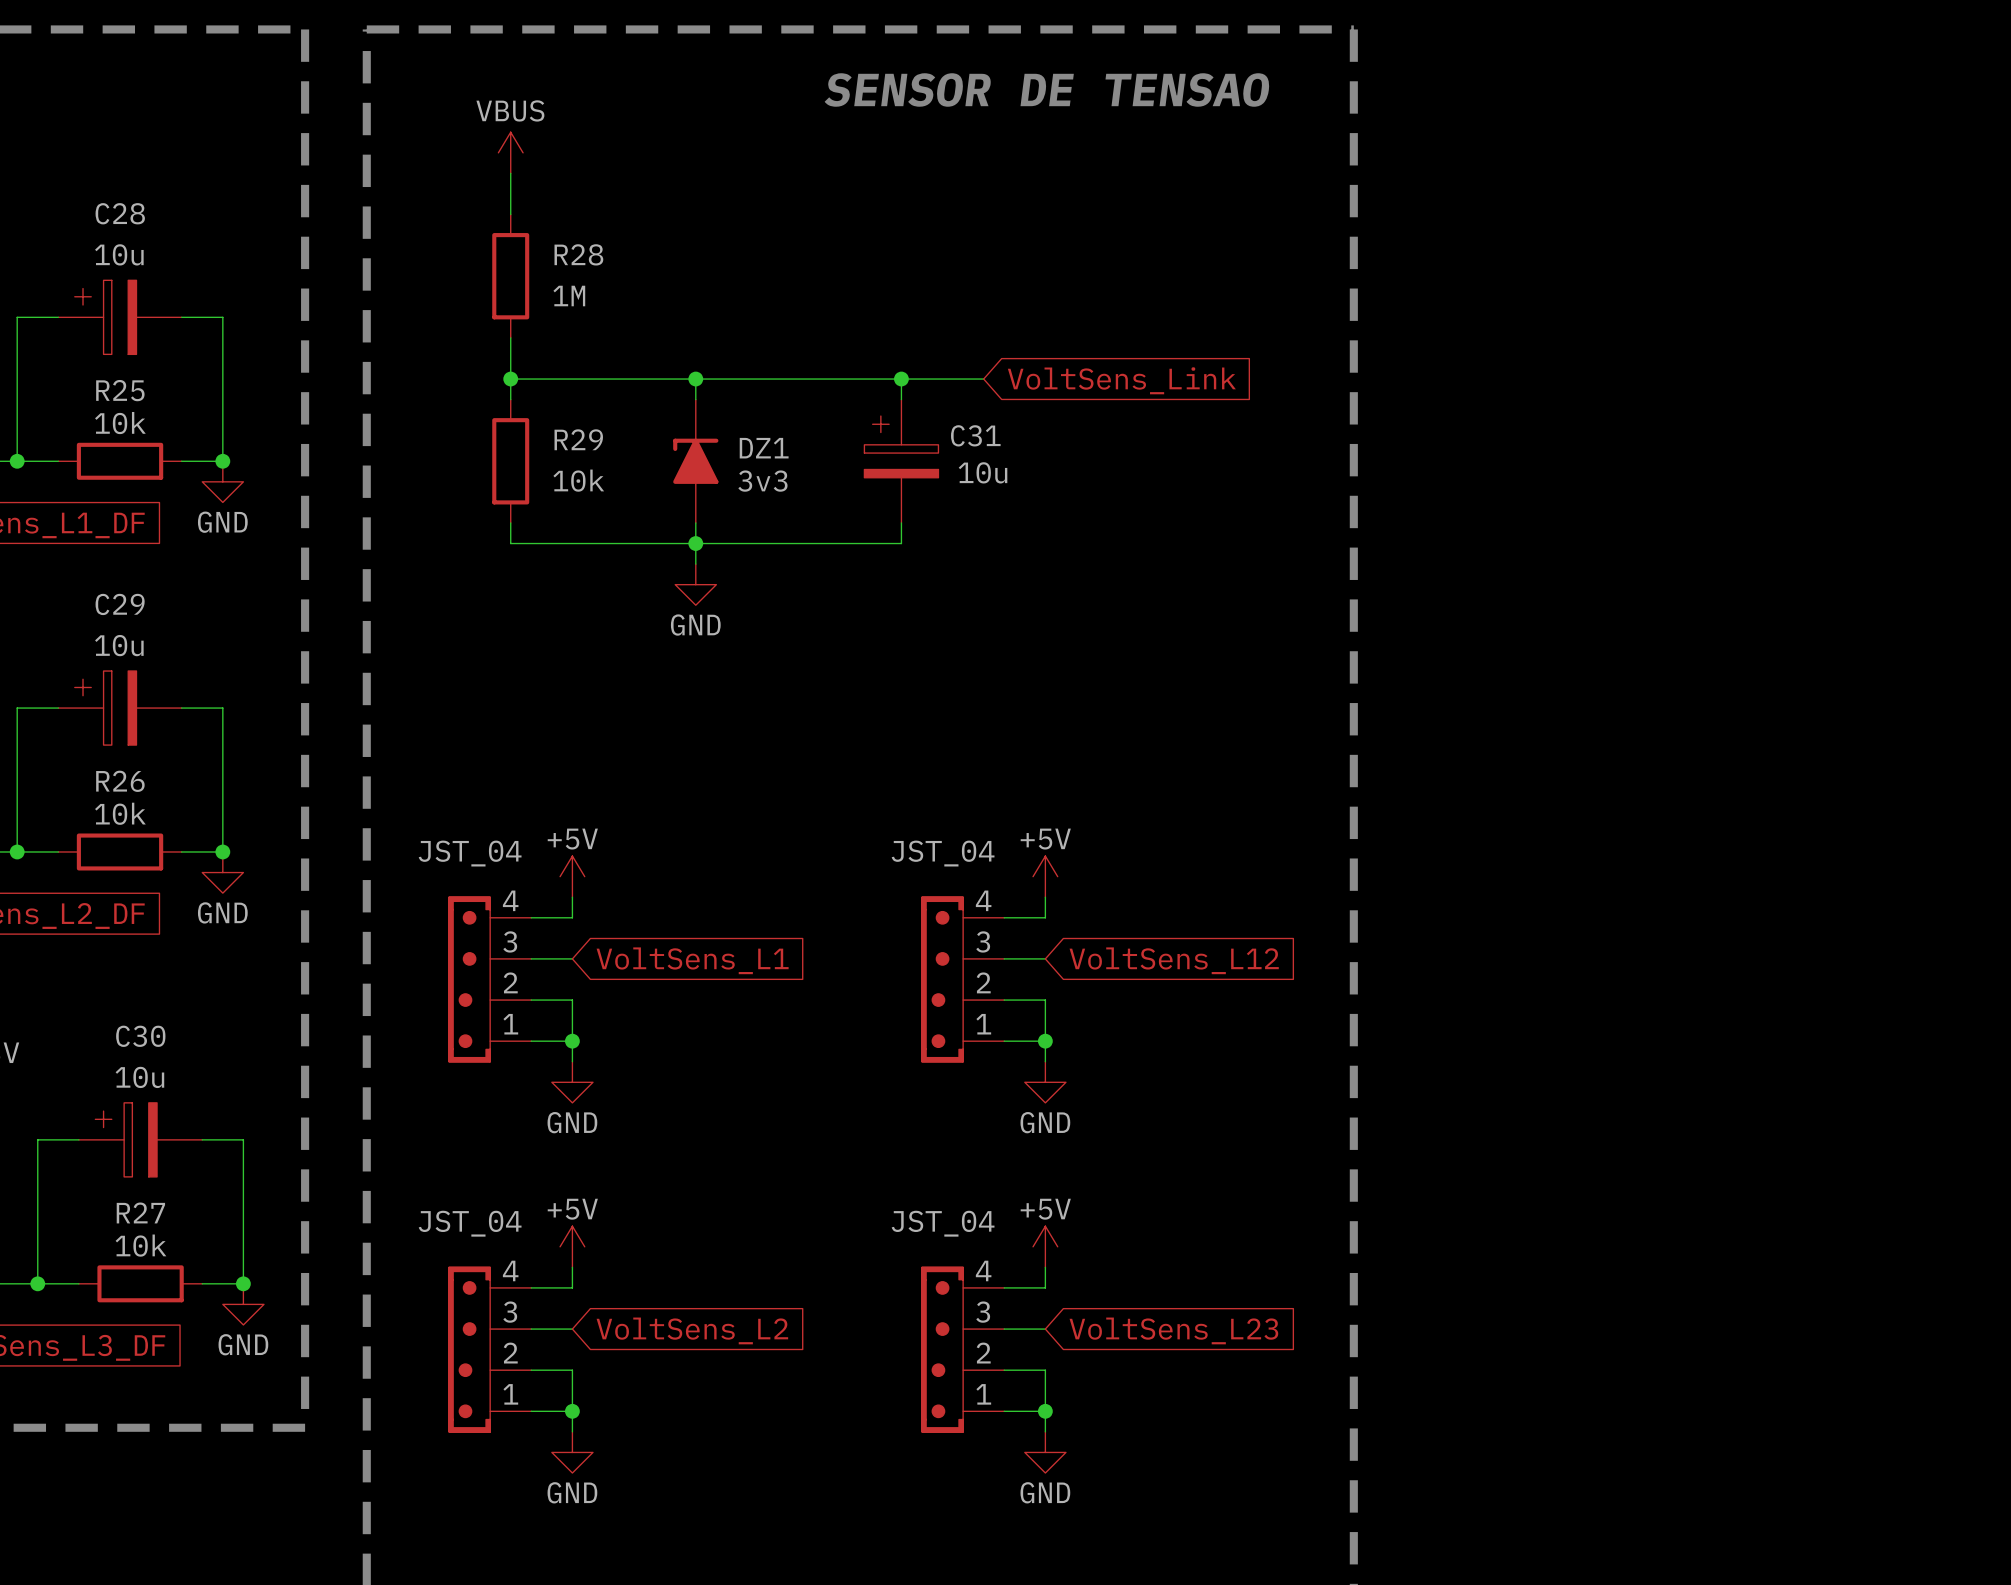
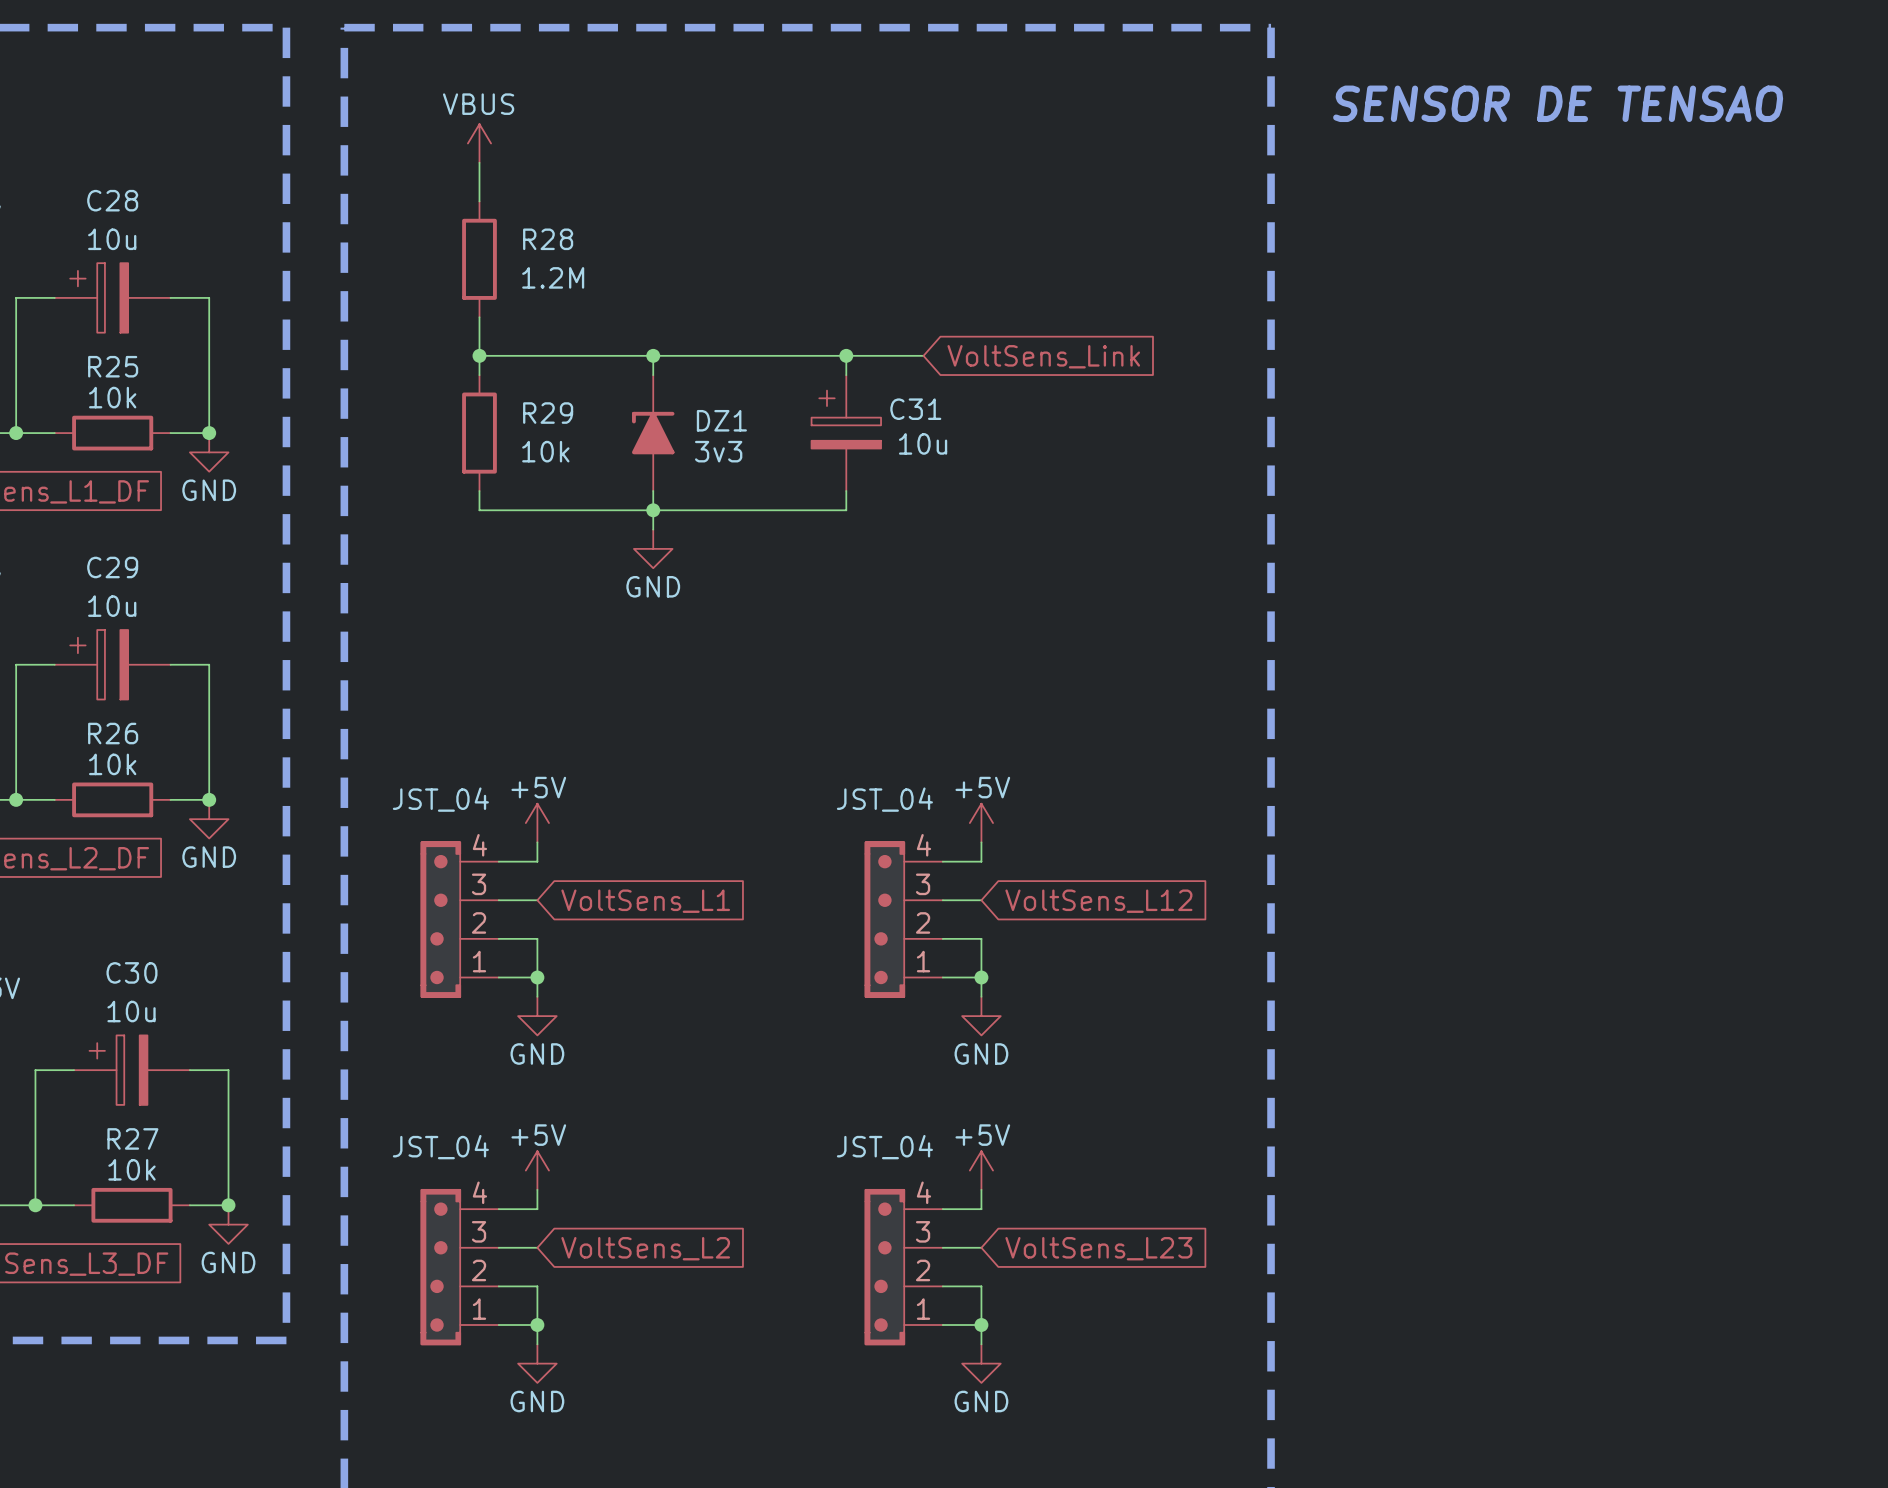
text: SENSOR DE TENSAO (1047, 89) -> none
text: none -> SENSOR DE TENSAO (1558, 103)
R28 value: 1M (569, 296) -> 1.2M (553, 277)

